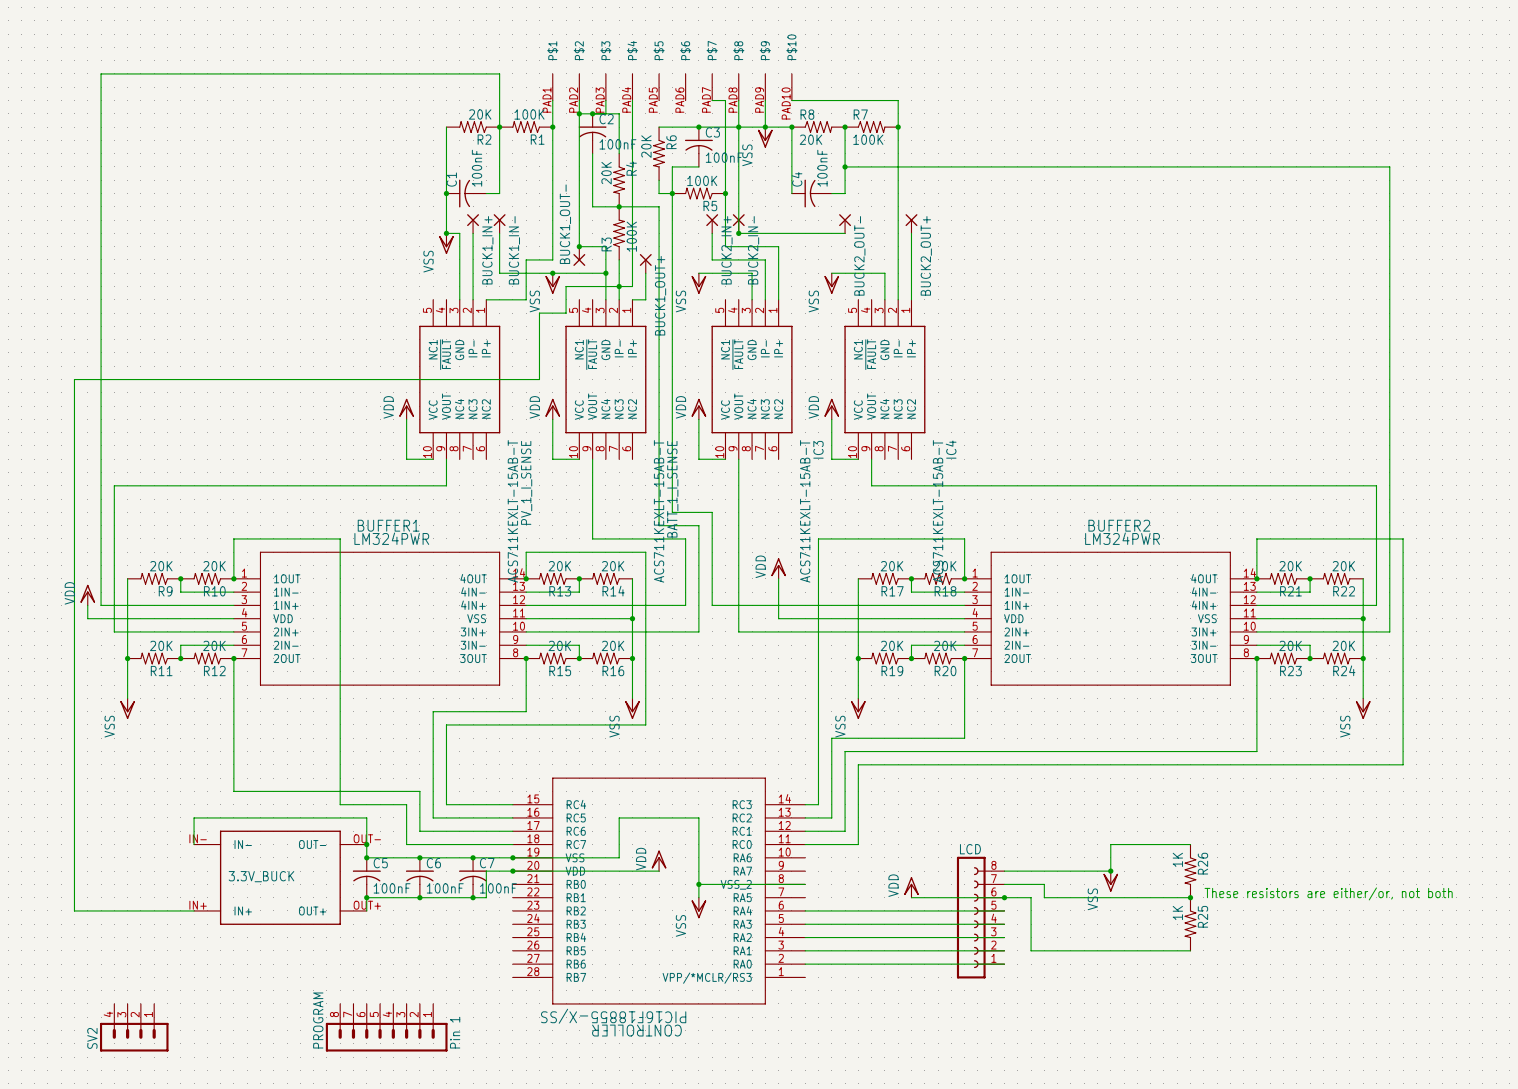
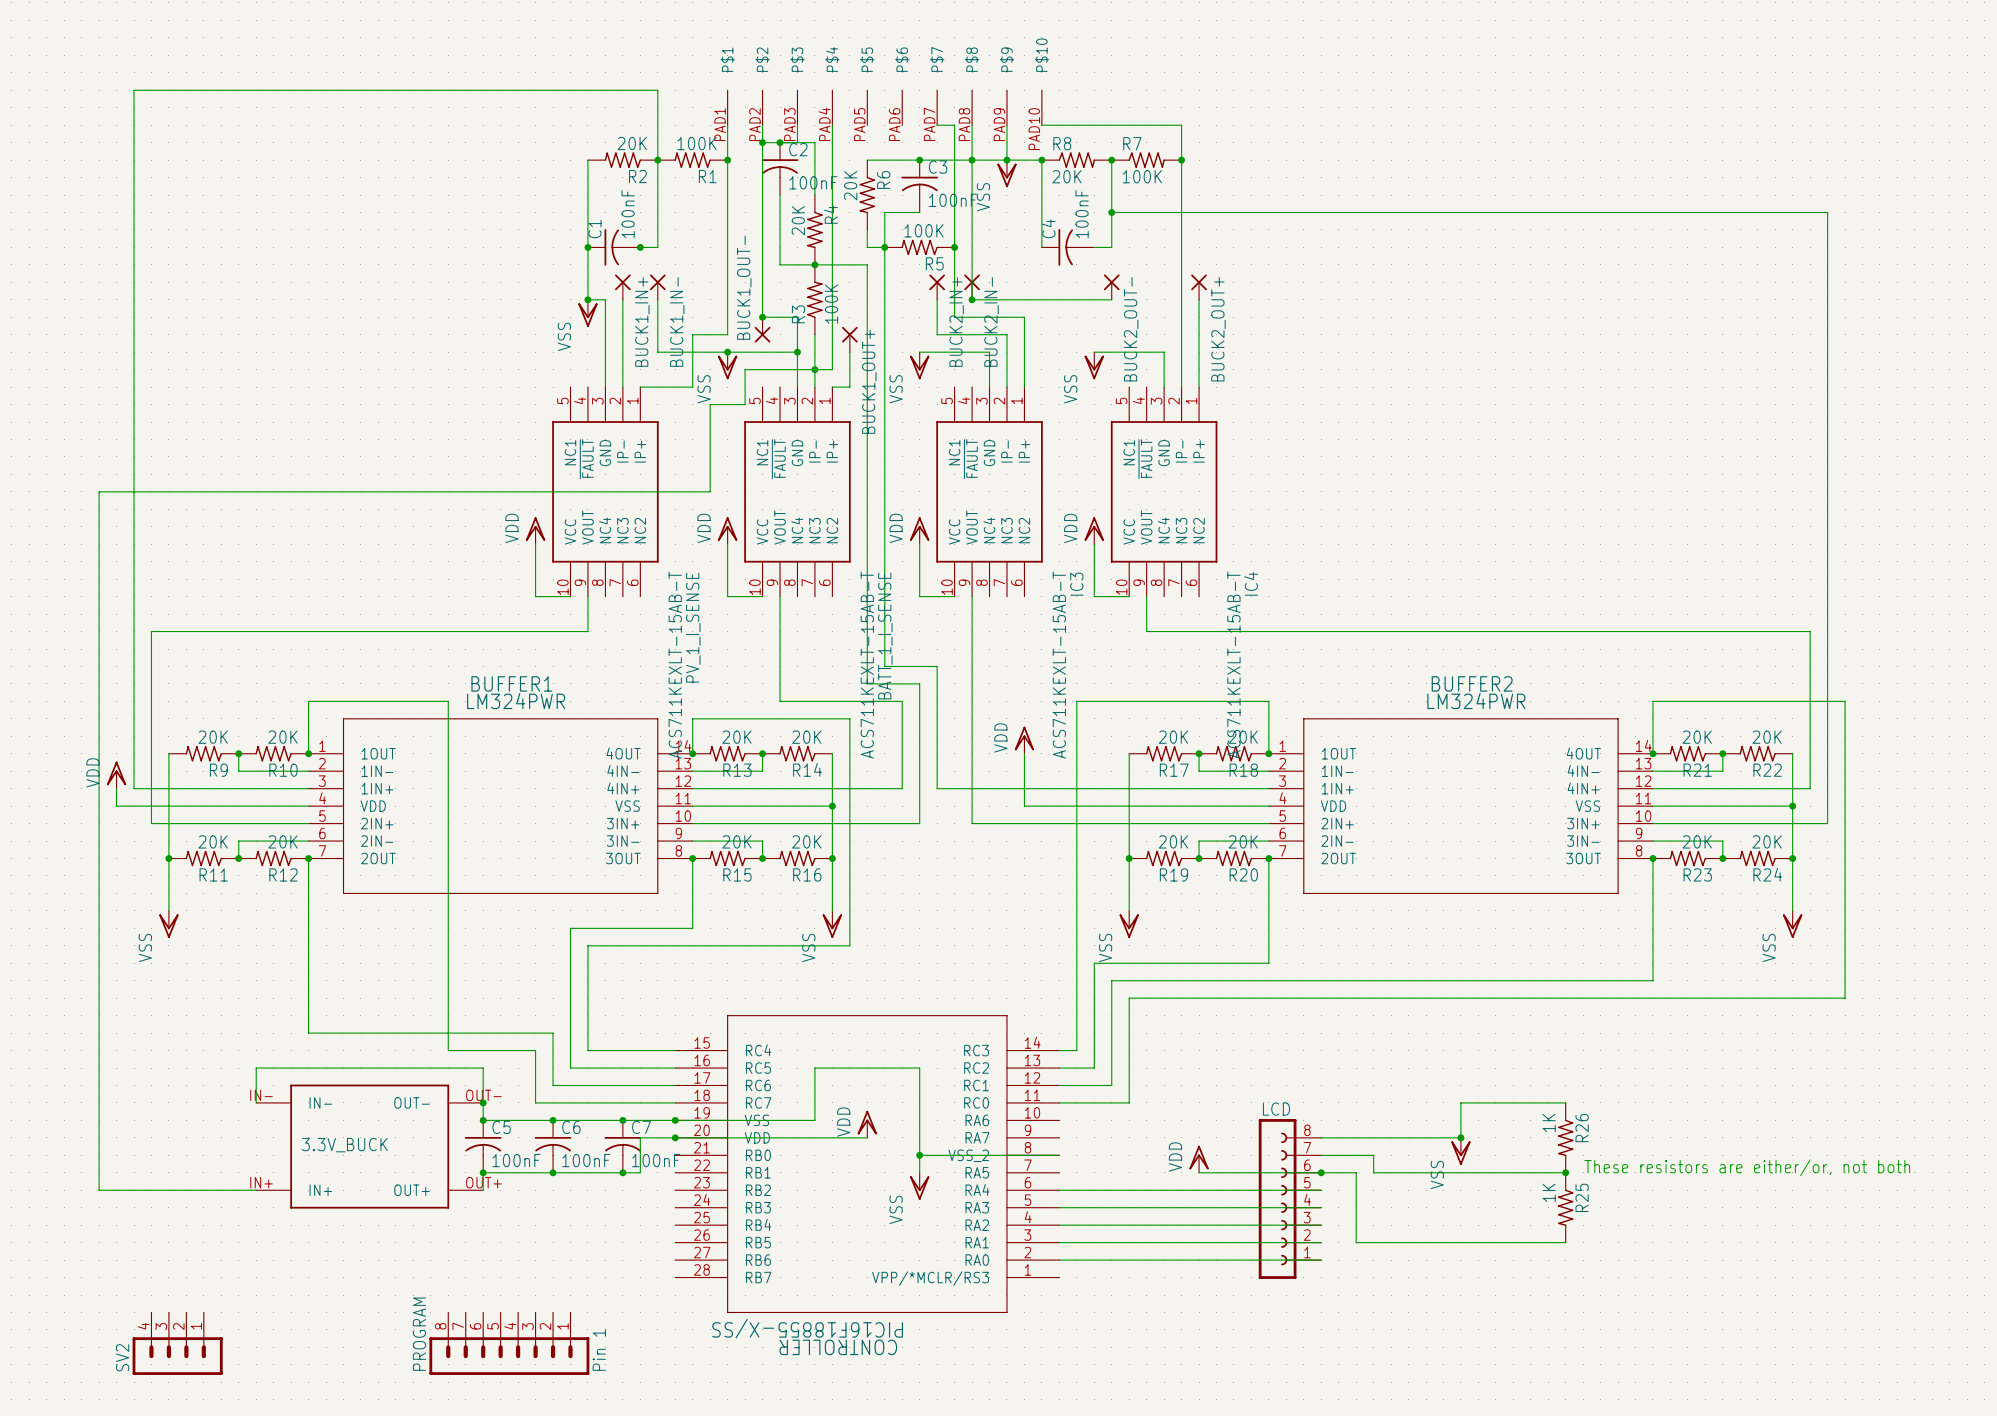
junction: none -> (640, 247)

